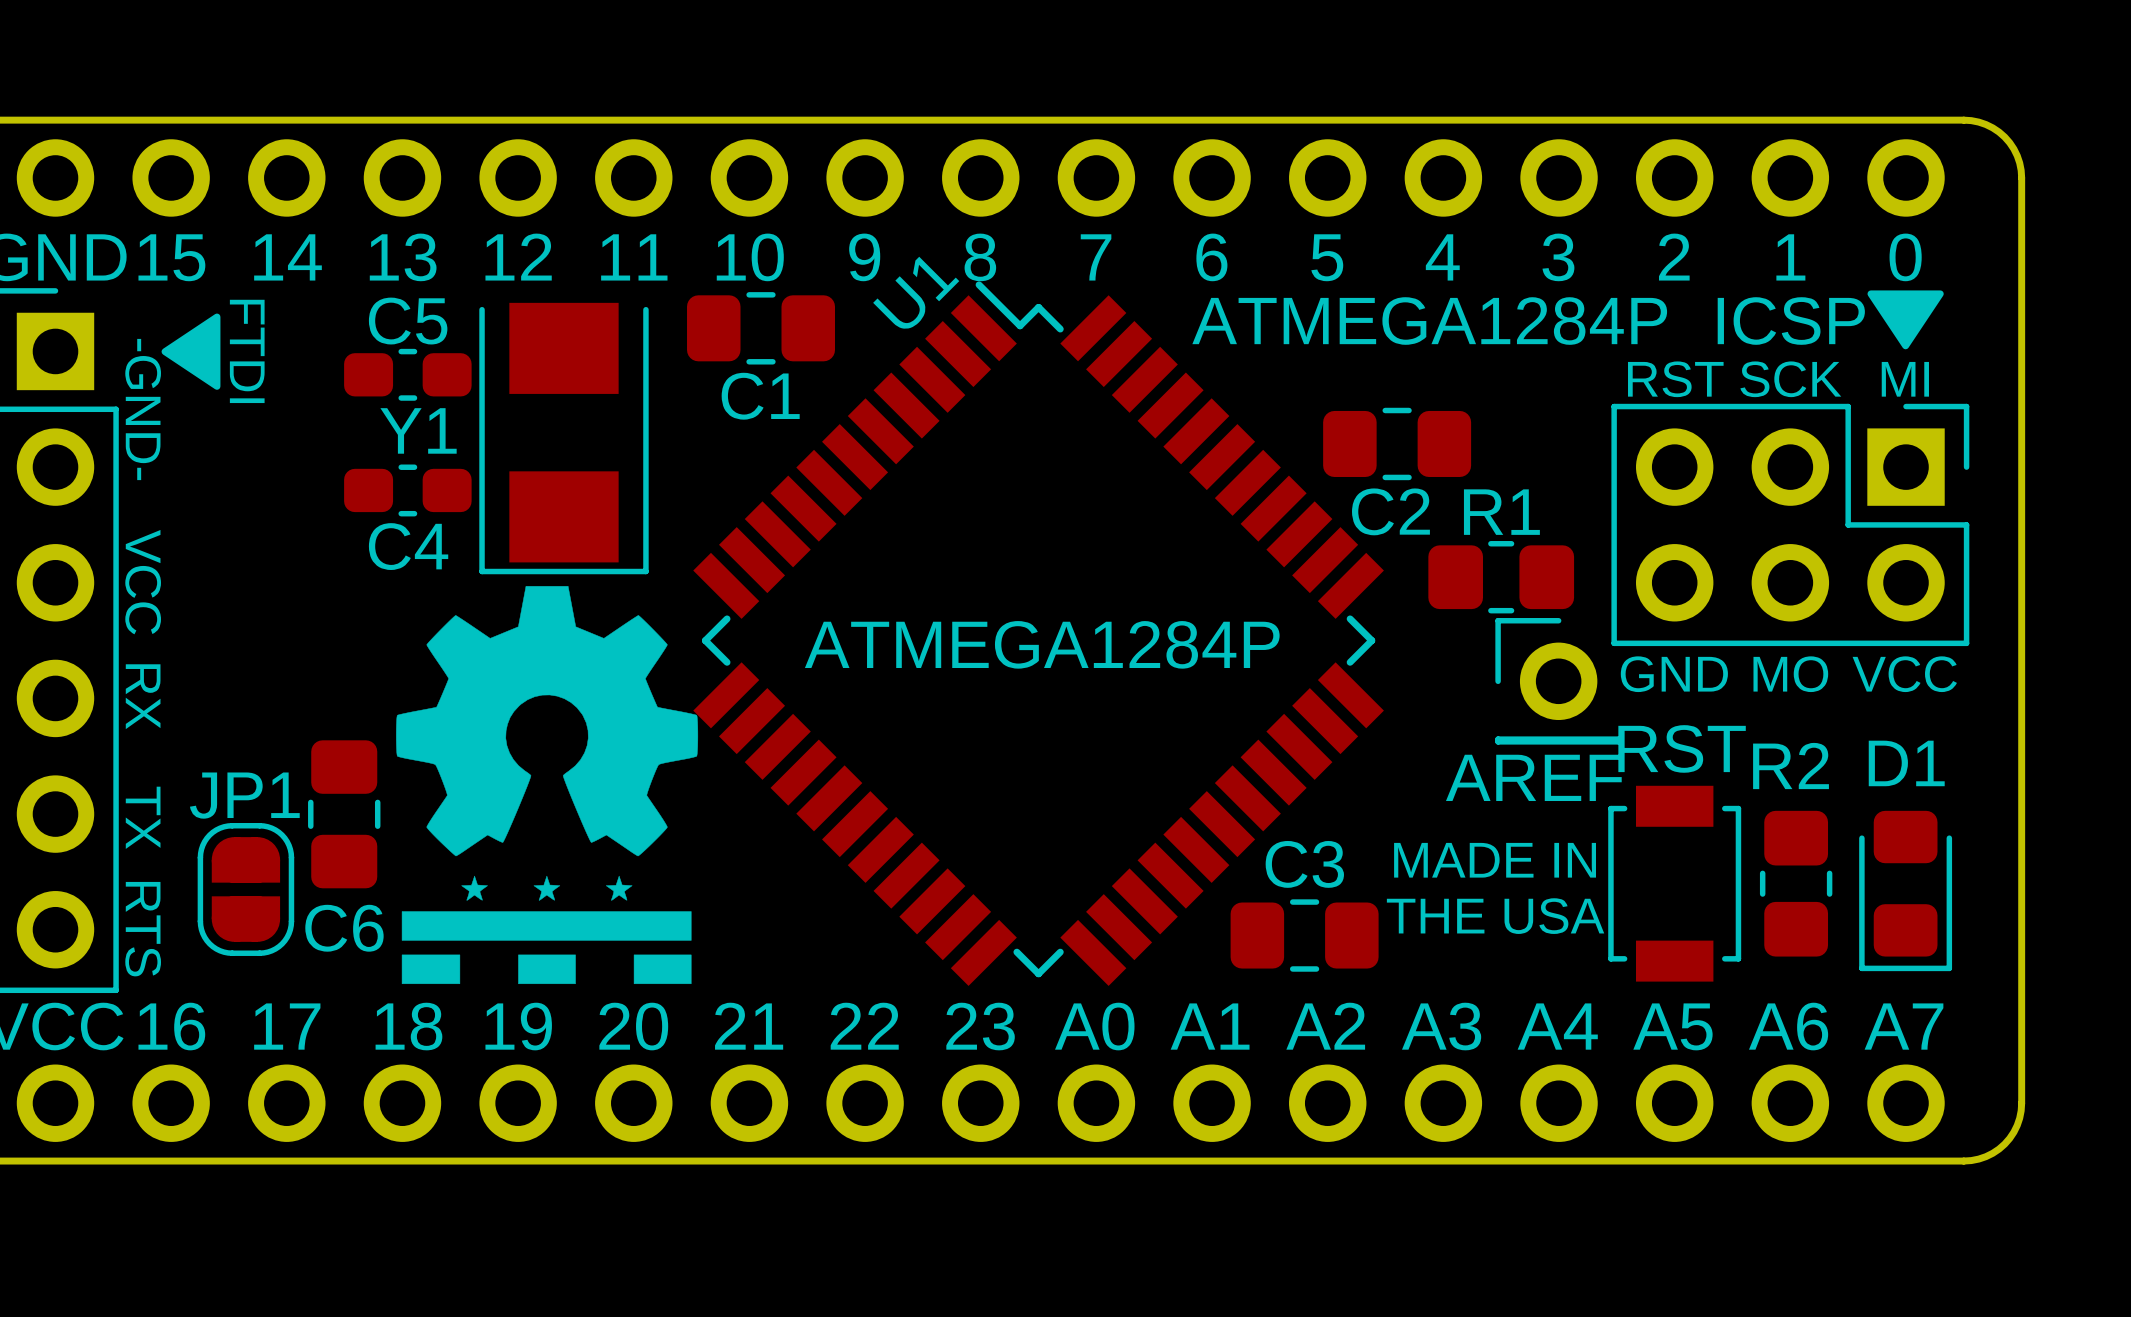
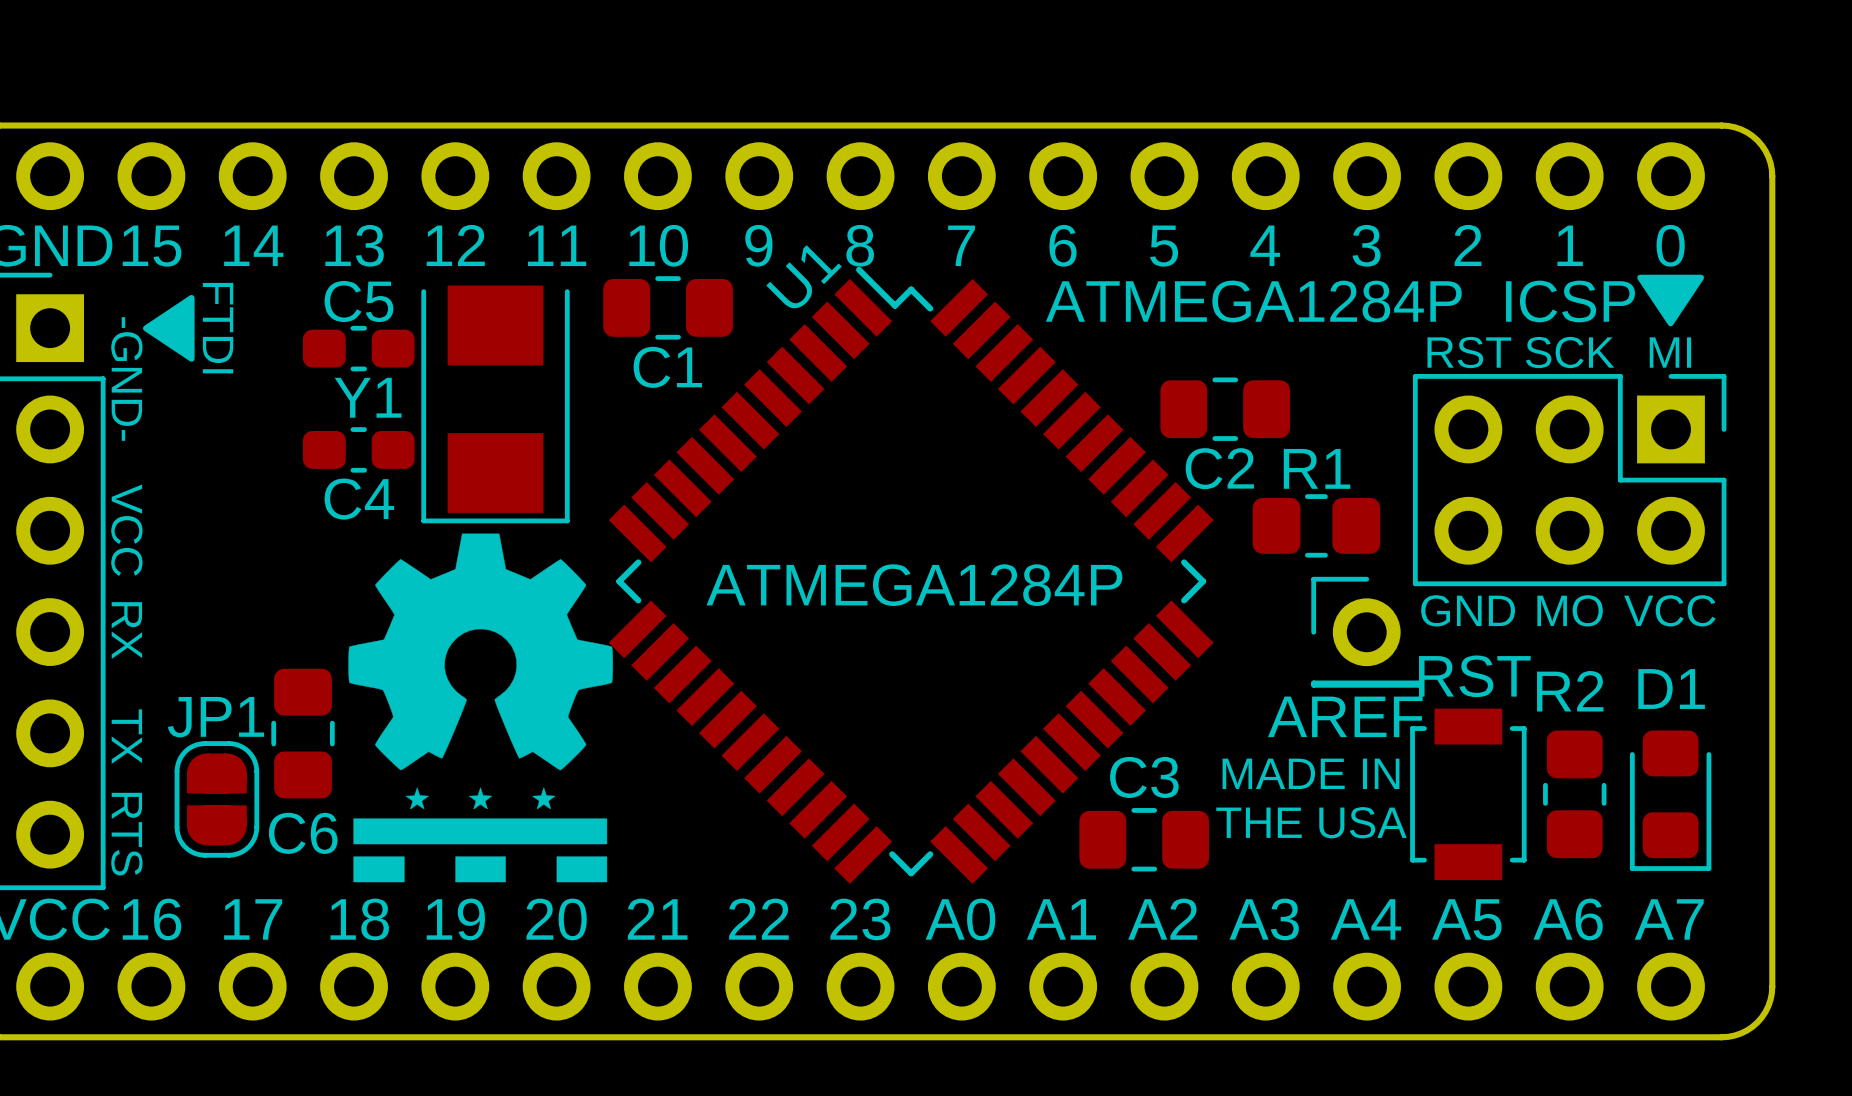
part position: (1558, 681) -> (1366, 632)
text position: AREF (1534, 777) -> AREF (1345, 716)

